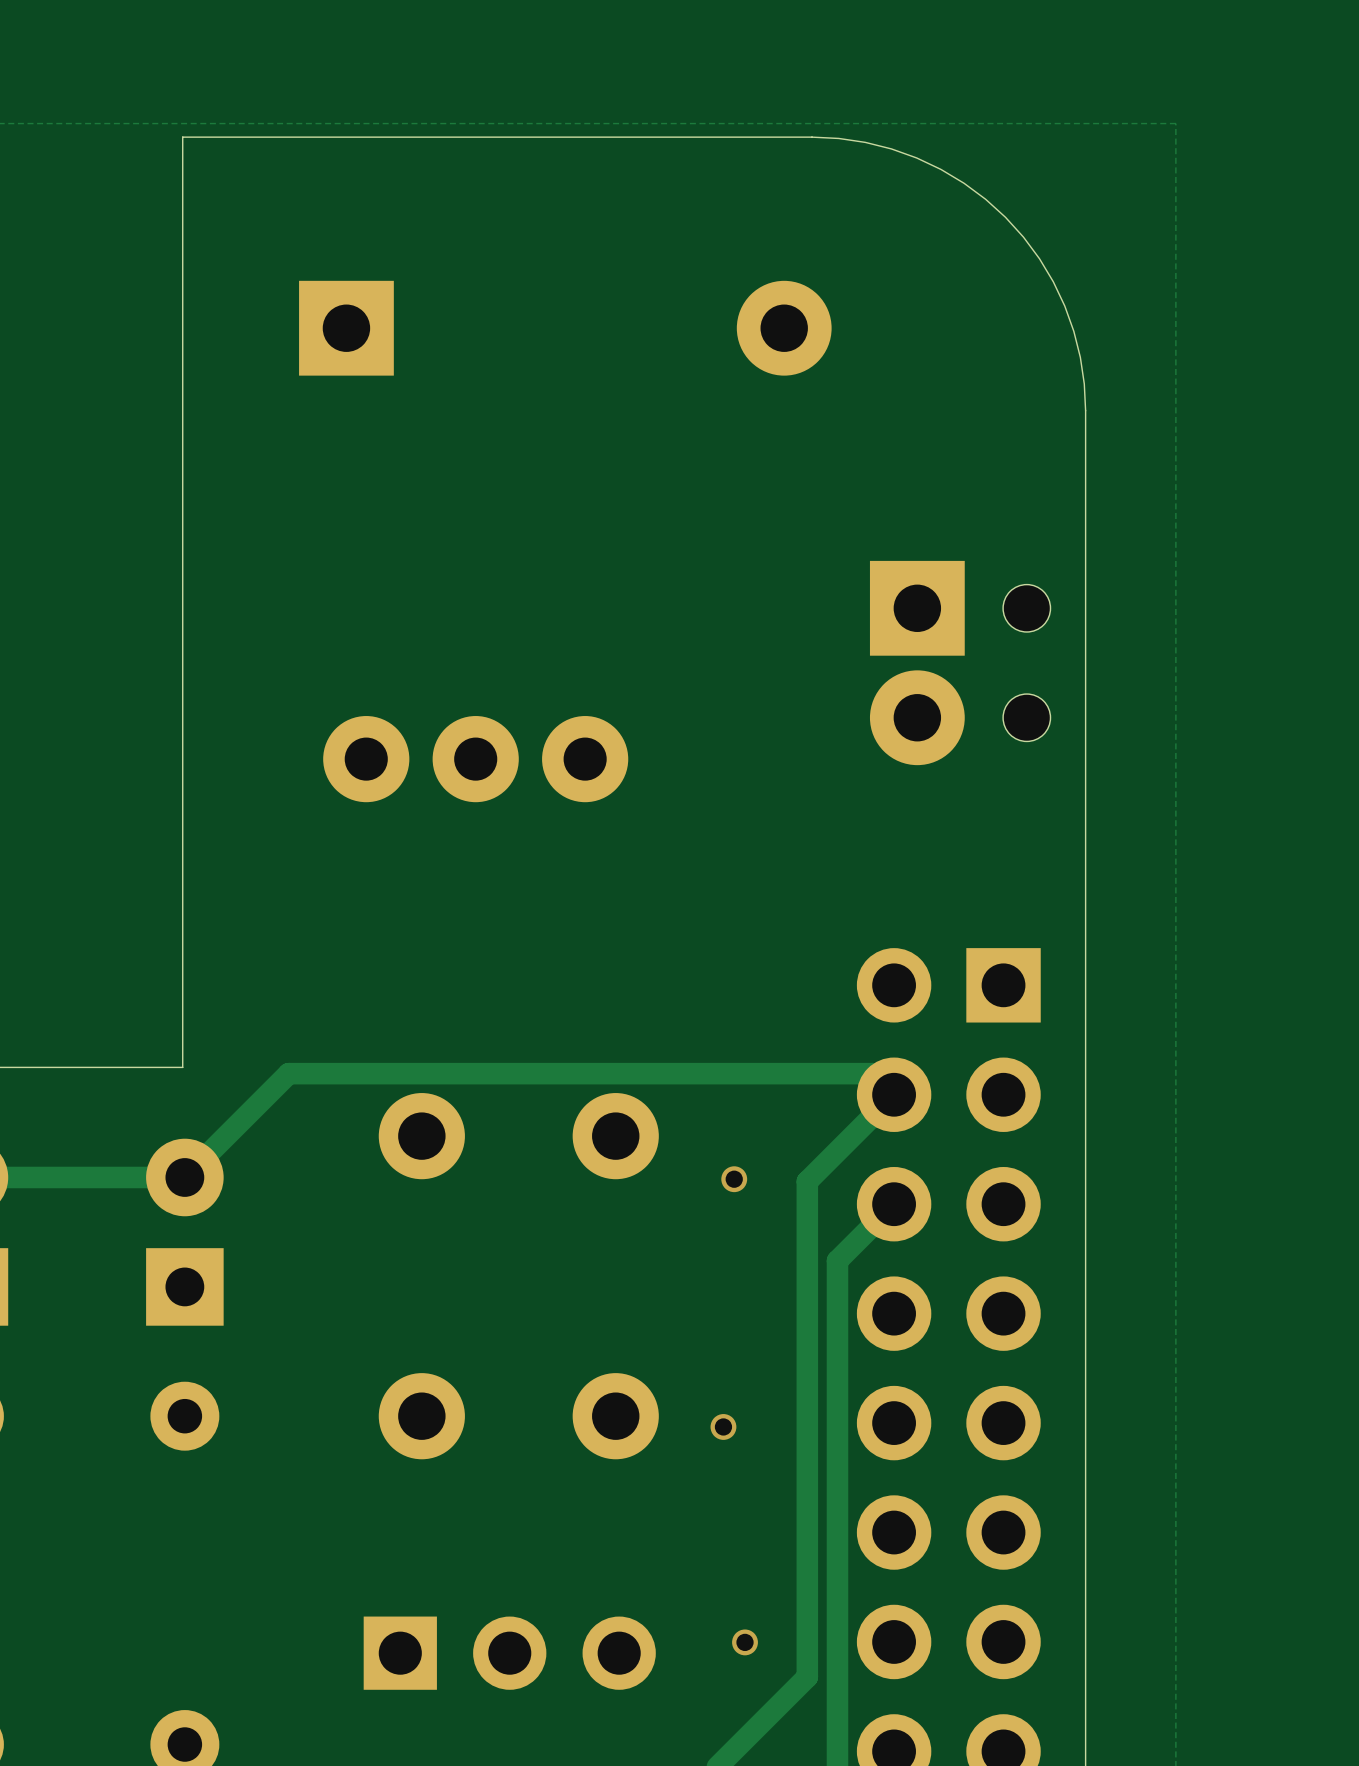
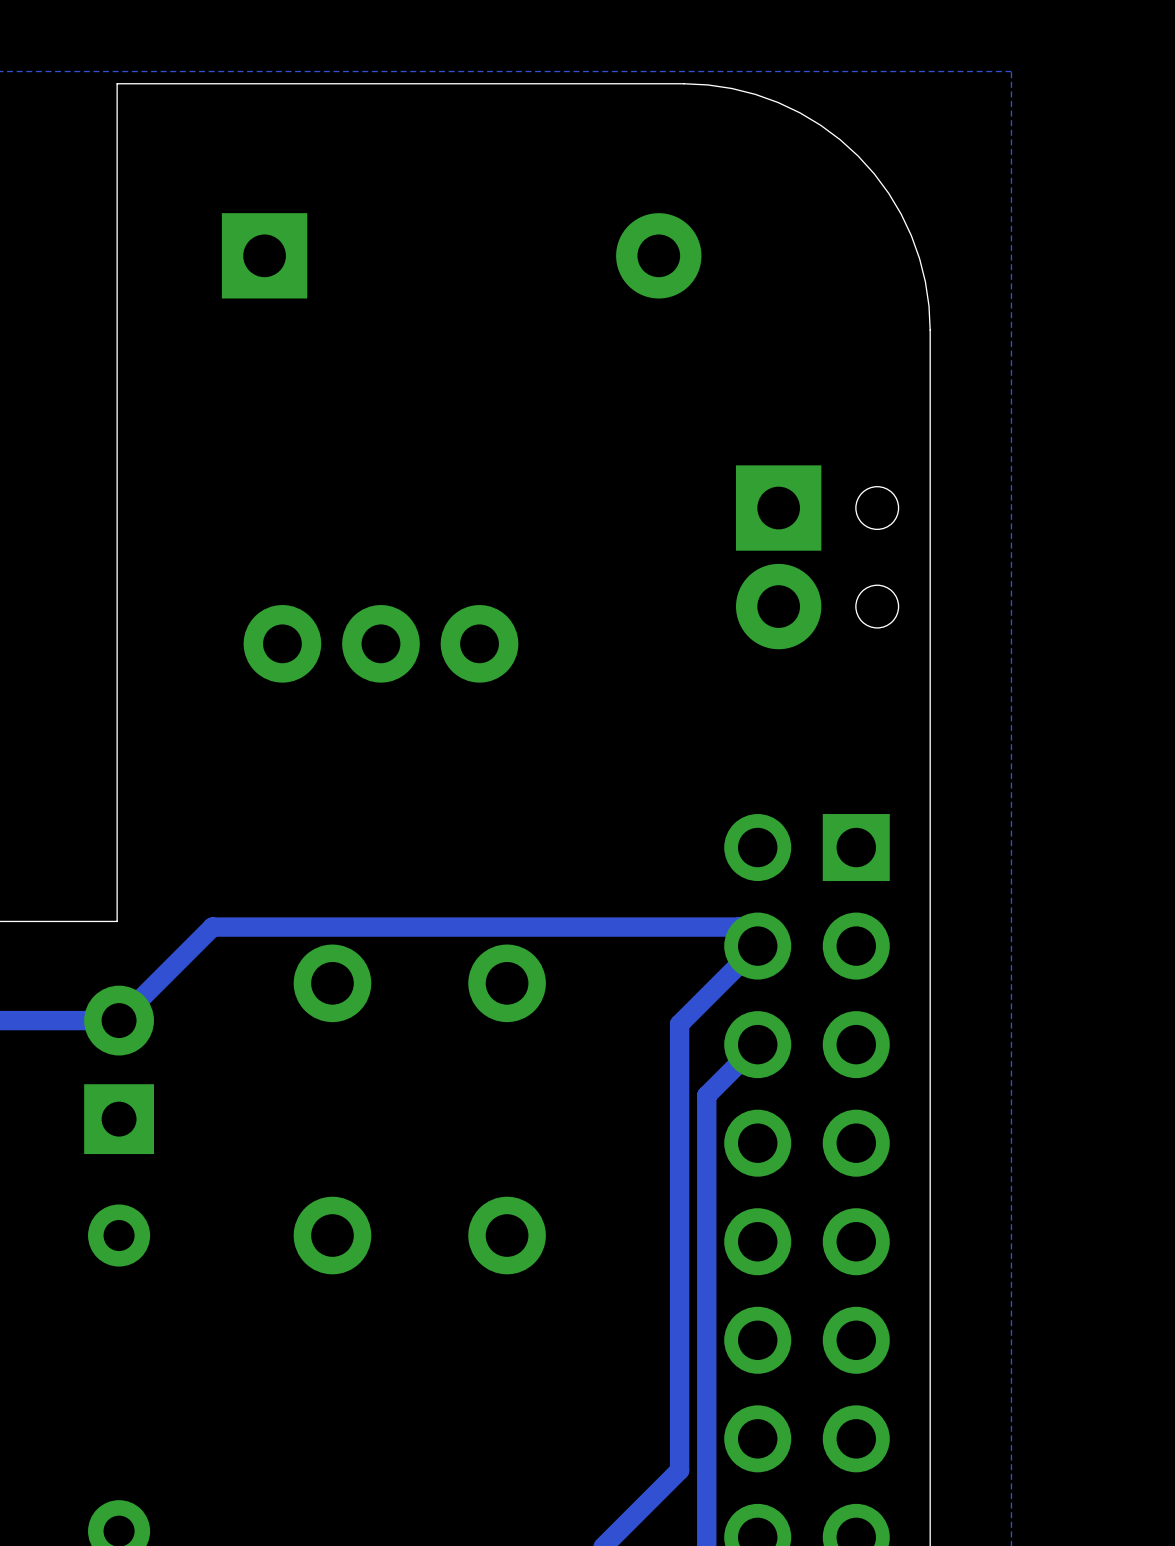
via: (734, 1179) -> none
via: (723, 1426) -> none
via: (745, 1642) -> none
part: (509, 1653) -> none

